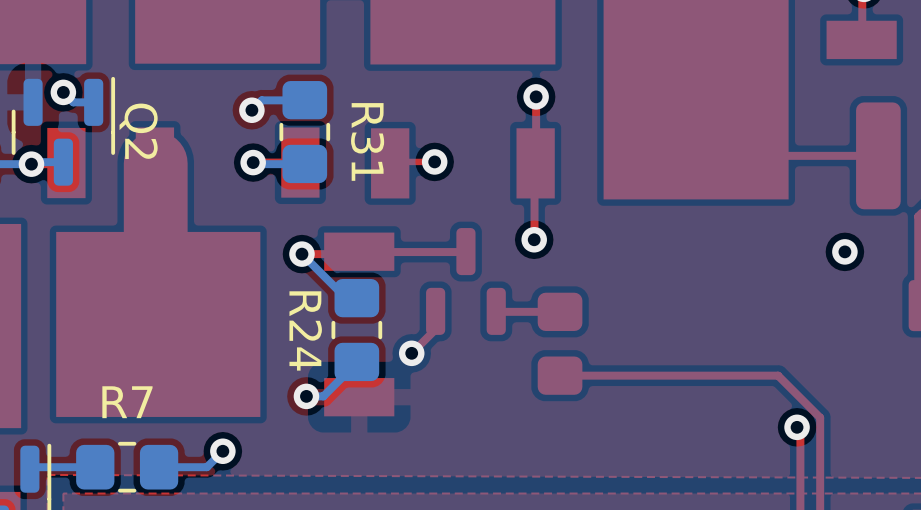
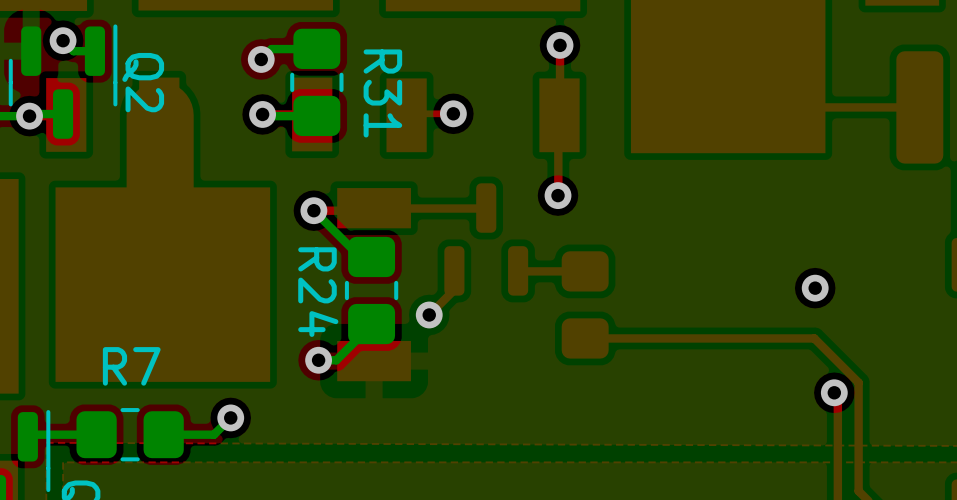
via position: (844, 251) -> (815, 288)

